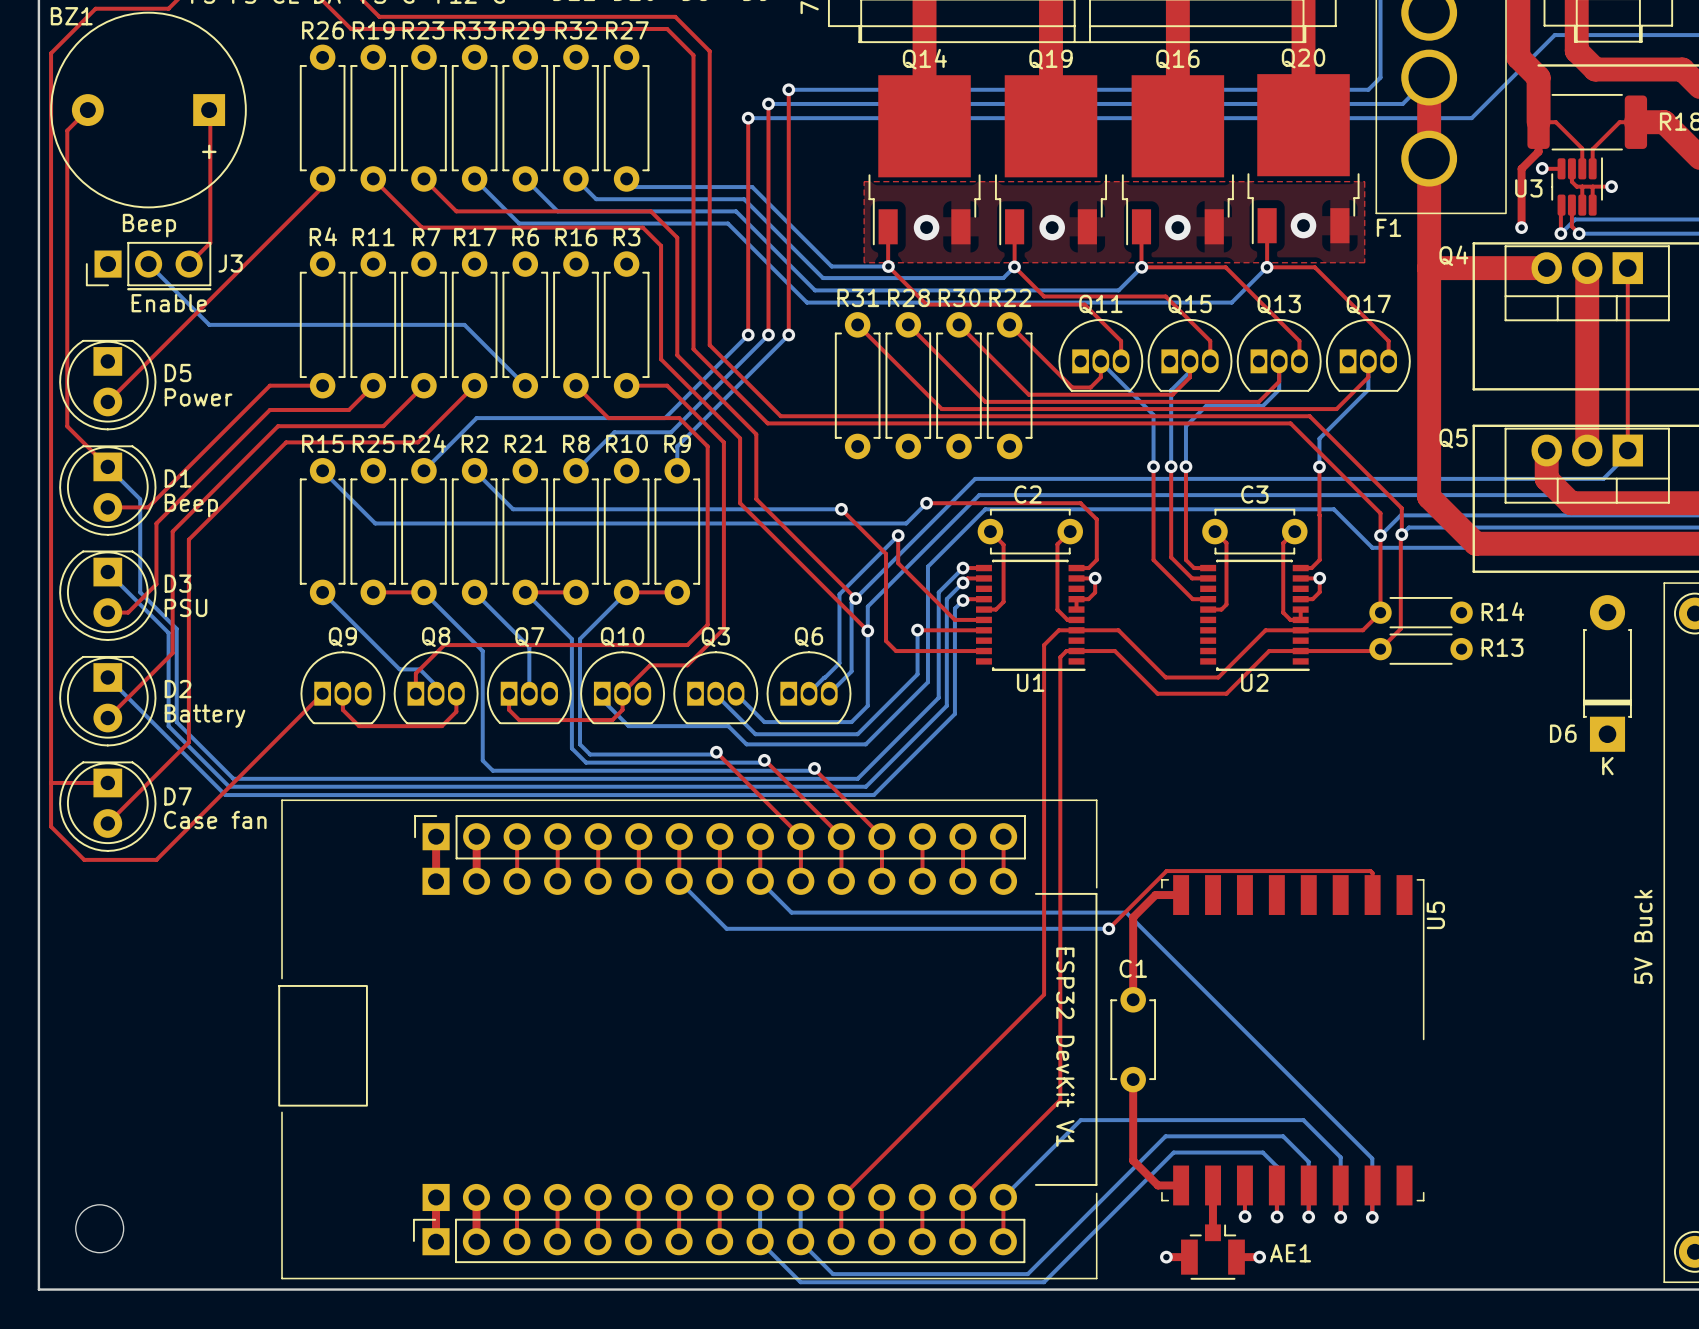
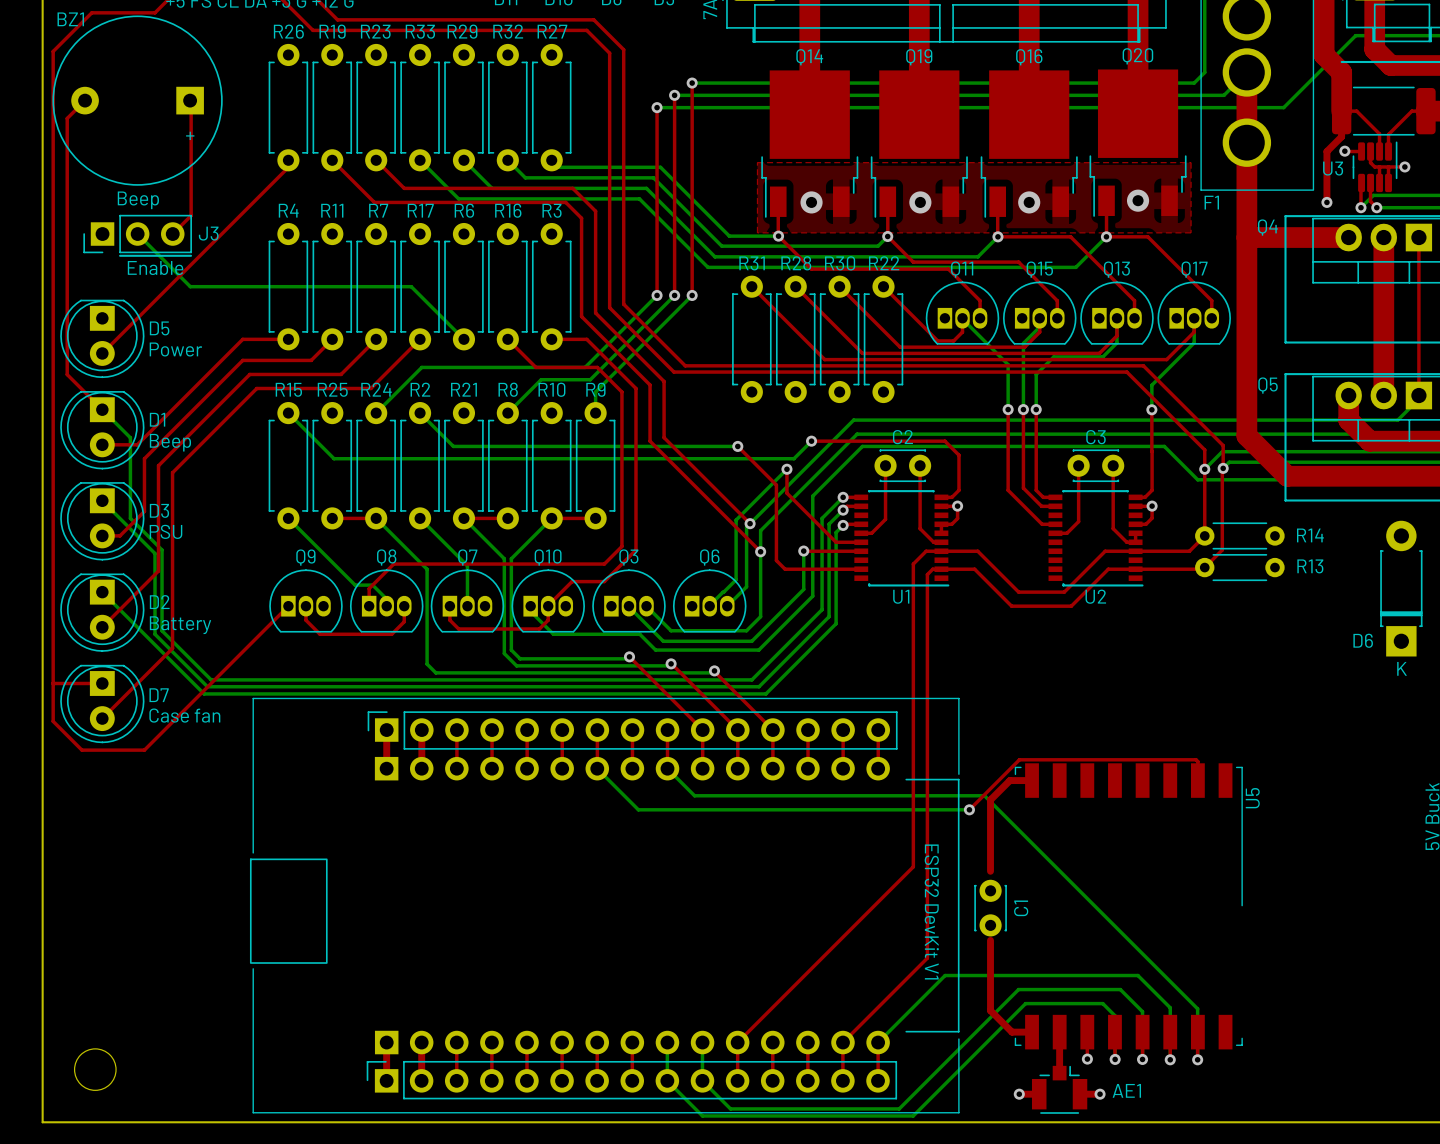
C2 footprint: [977, 508, 1083, 555] -> [874, 449, 932, 483]
C3 footprint: [1202, 508, 1308, 555] -> [1067, 449, 1125, 483]
top track: (990, 531) (1003, 544) (1003, 601) -> (885, 465) (885, 519) (878, 526)
top track: (1070, 531) (1057, 544) (1057, 609) -> (920, 465) (920, 528) (924, 533)
top track: (1214, 531) (1226, 543) (1226, 604) -> (1078, 465) (1078, 521) (1071, 528)
top track: (1294, 531) (1283, 543) (1283, 612) -> (1113, 465) (1113, 528) (1120, 535)
C1 name position: C1 (1133, 968) -> C1 (1021, 908)
C1 footprint: [1110, 987, 1157, 1093] -> [974, 879, 1007, 937]

